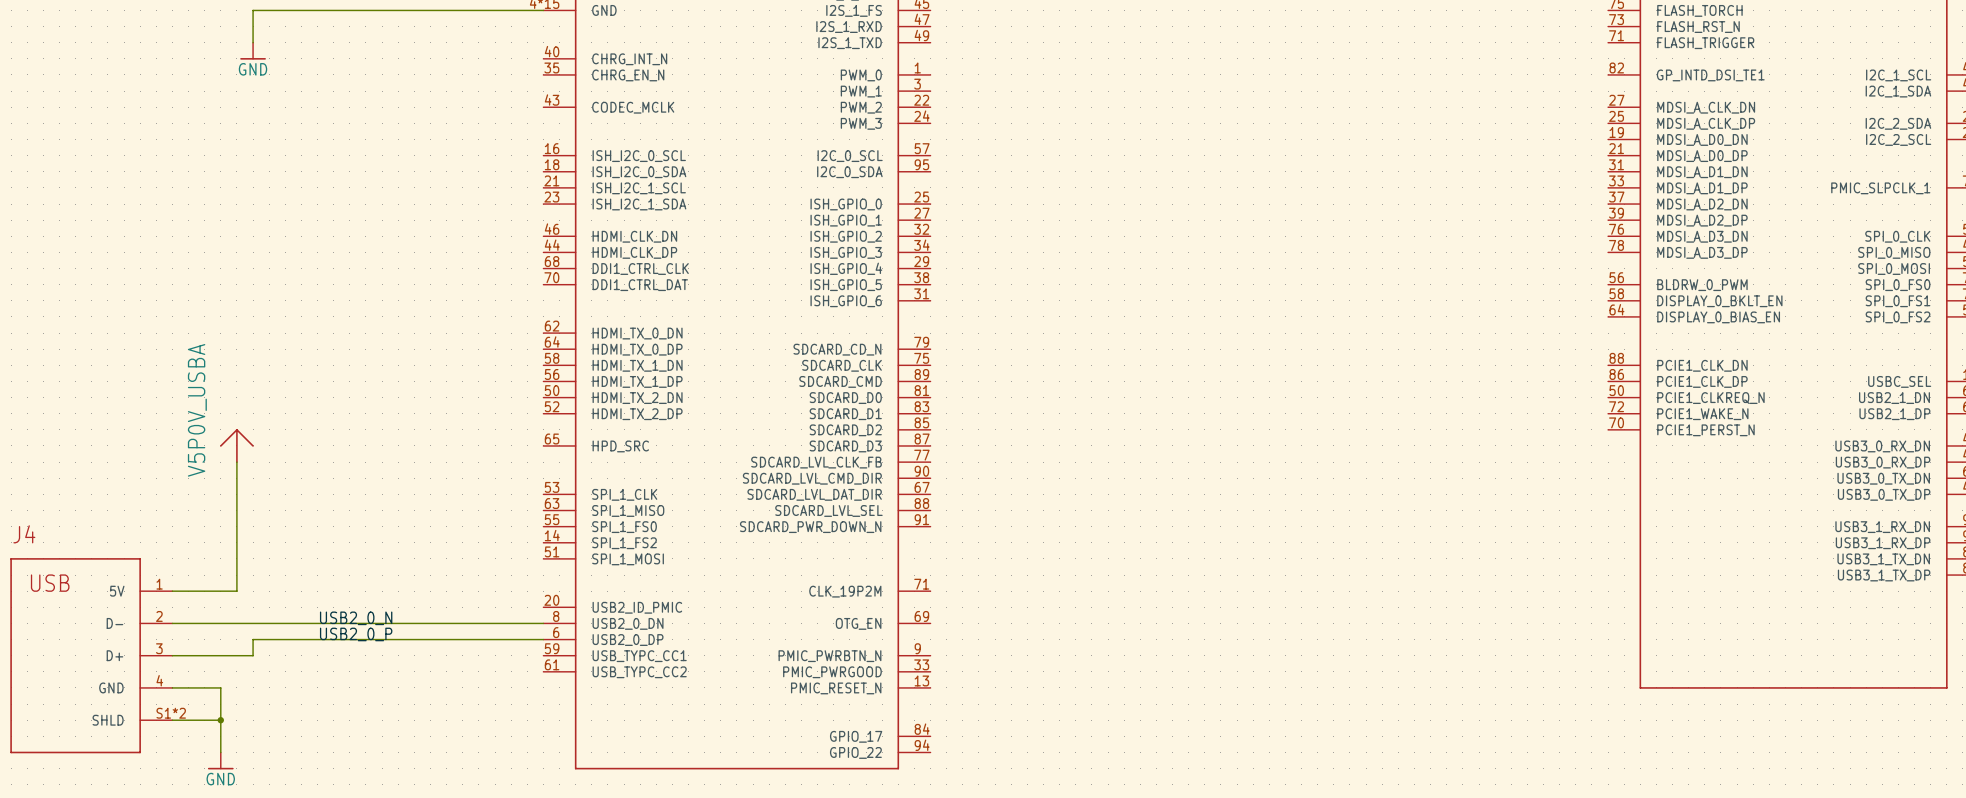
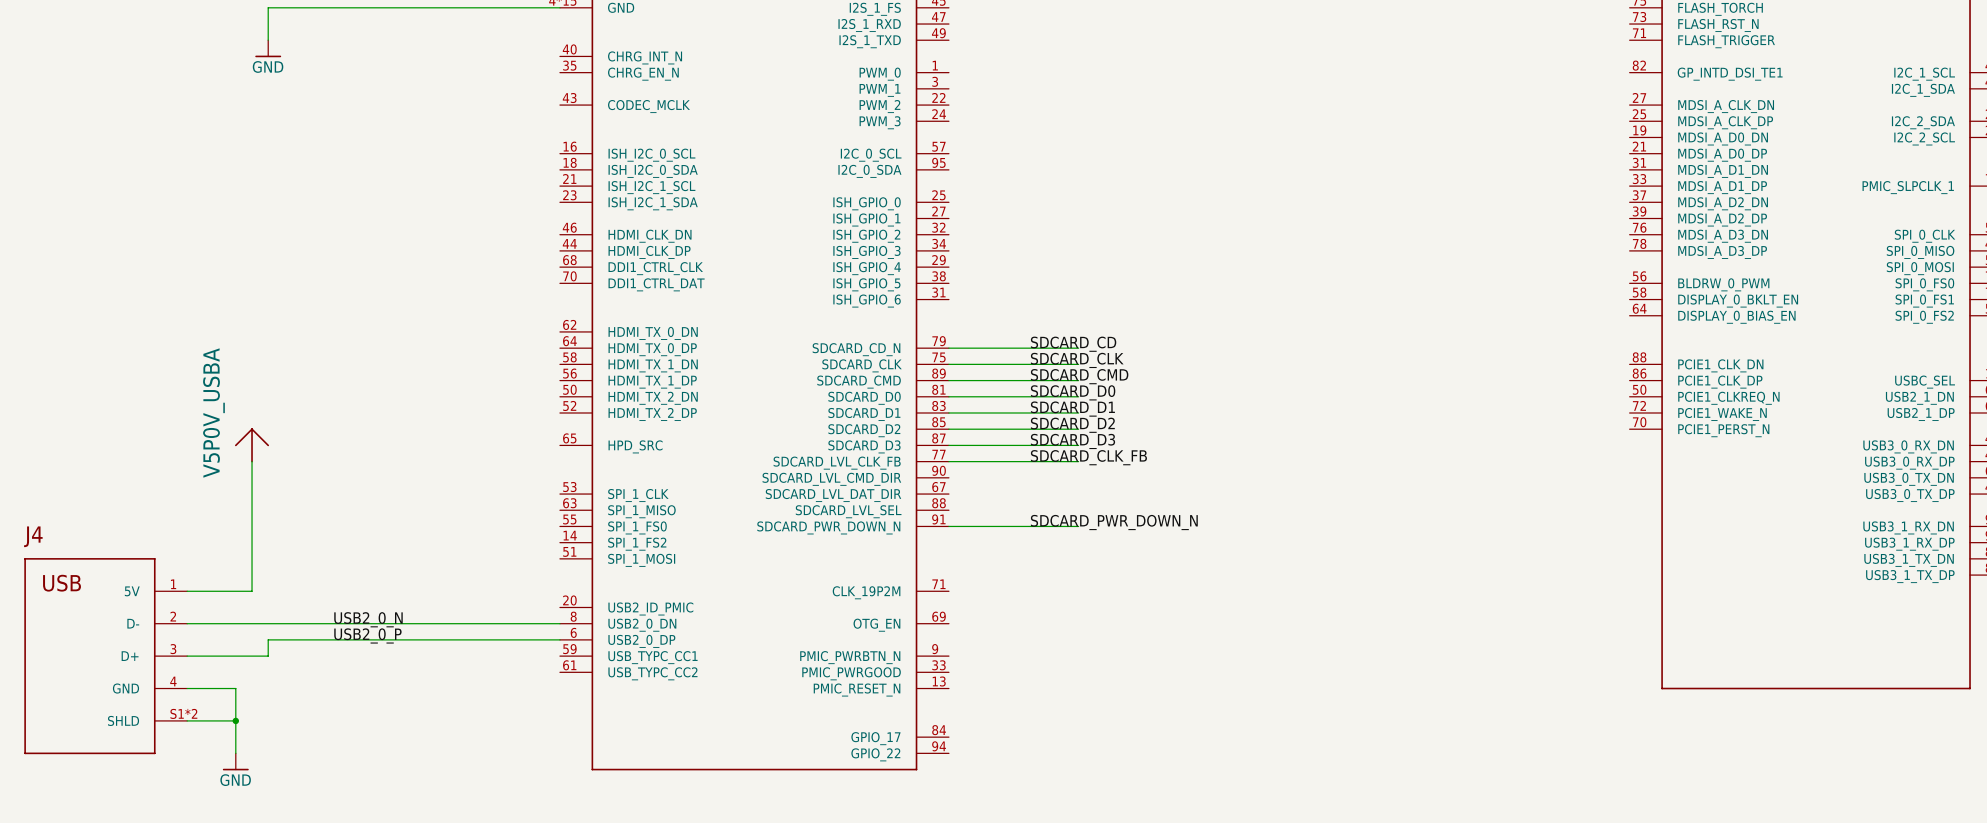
label: none -> SDCARD_CD (1073, 344)
wire: none -> (948, 348) (1078, 348)
label: none -> SDCARD_CLK (1077, 360)
wire: none -> (948, 364) (1078, 364)
label: none -> SDCARD_CMD (1079, 376)
wire: none -> (948, 380) (1078, 380)
label: none -> SDCARD_D0 (1073, 392)
wire: none -> (948, 396) (1078, 396)
label: none -> SDCARD_D1 (1072, 409)
wire: none -> (948, 412) (1078, 412)
label: none -> SDCARD_D2 (1072, 425)
wire: none -> (948, 429) (1078, 429)
label: none -> SDCARD_D3 (1072, 441)
wire: none -> (948, 445) (1078, 445)
label: none -> SDCARD_CLK_FB (1088, 457)
wire: none -> (948, 461) (1078, 461)
label: none -> SDCARD_PWR_DOWN_N (1114, 522)
wire: none -> (948, 526) (1078, 526)

